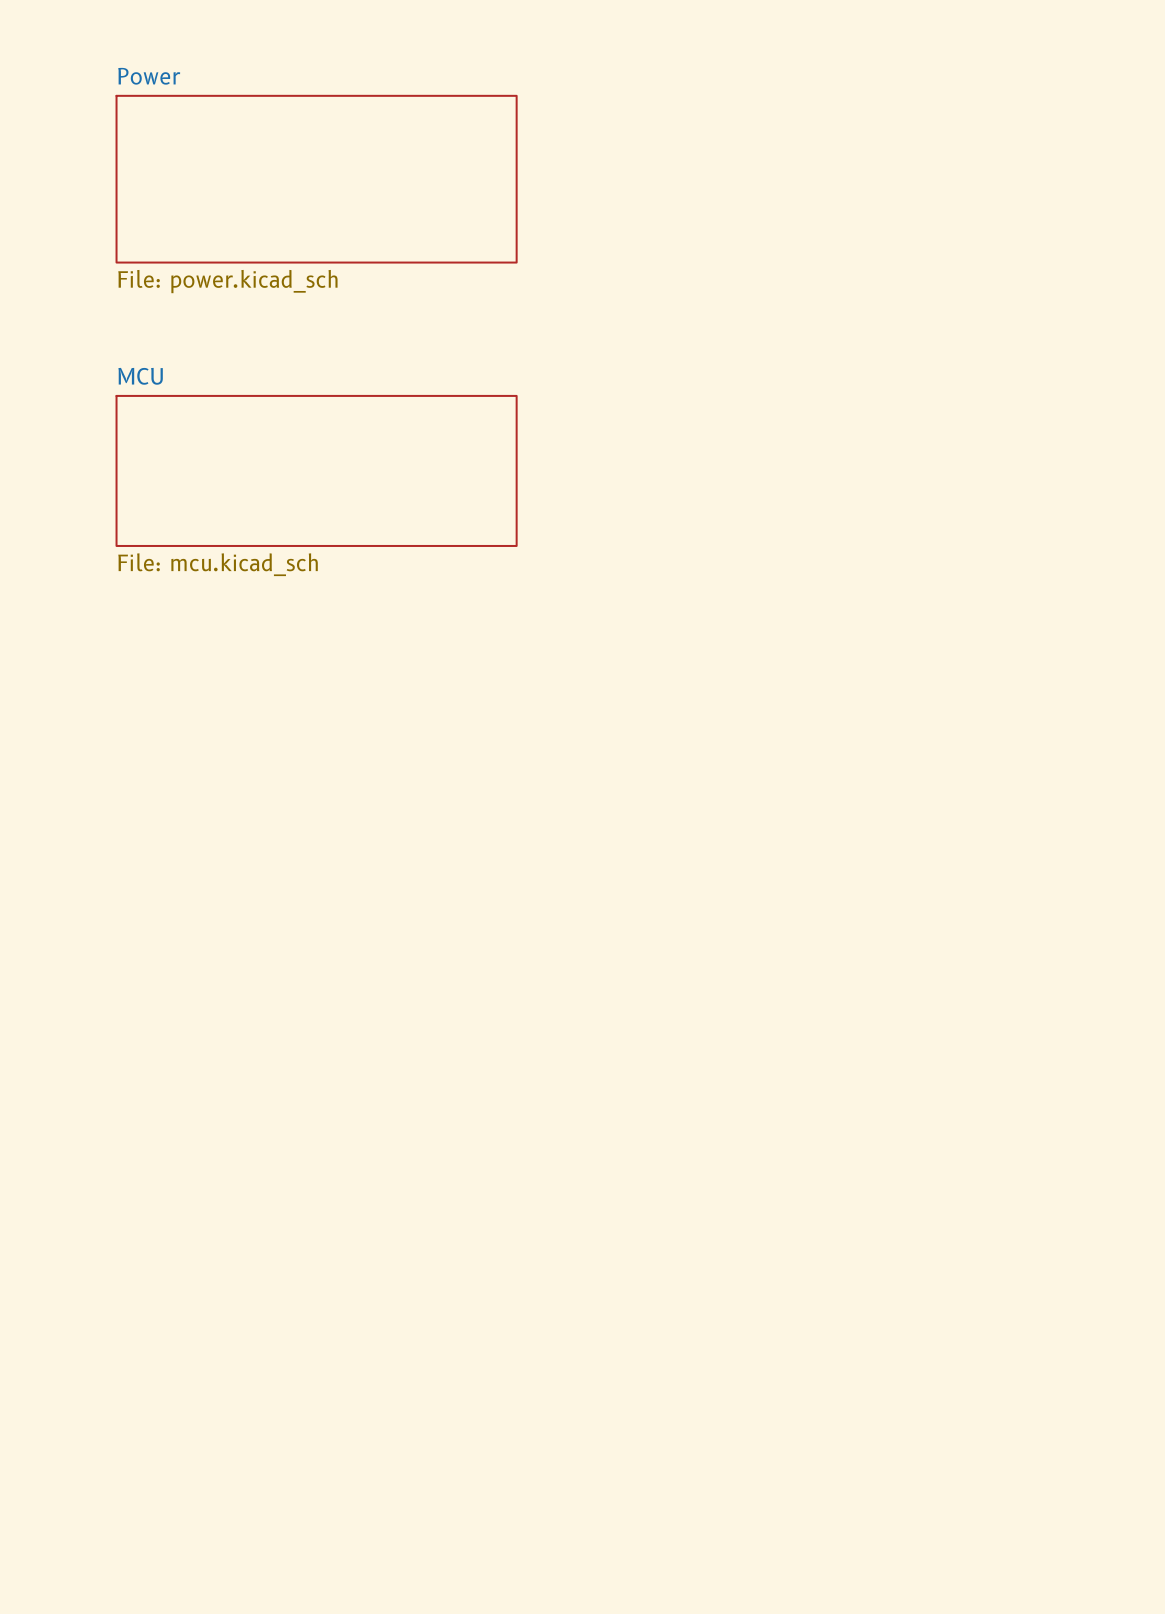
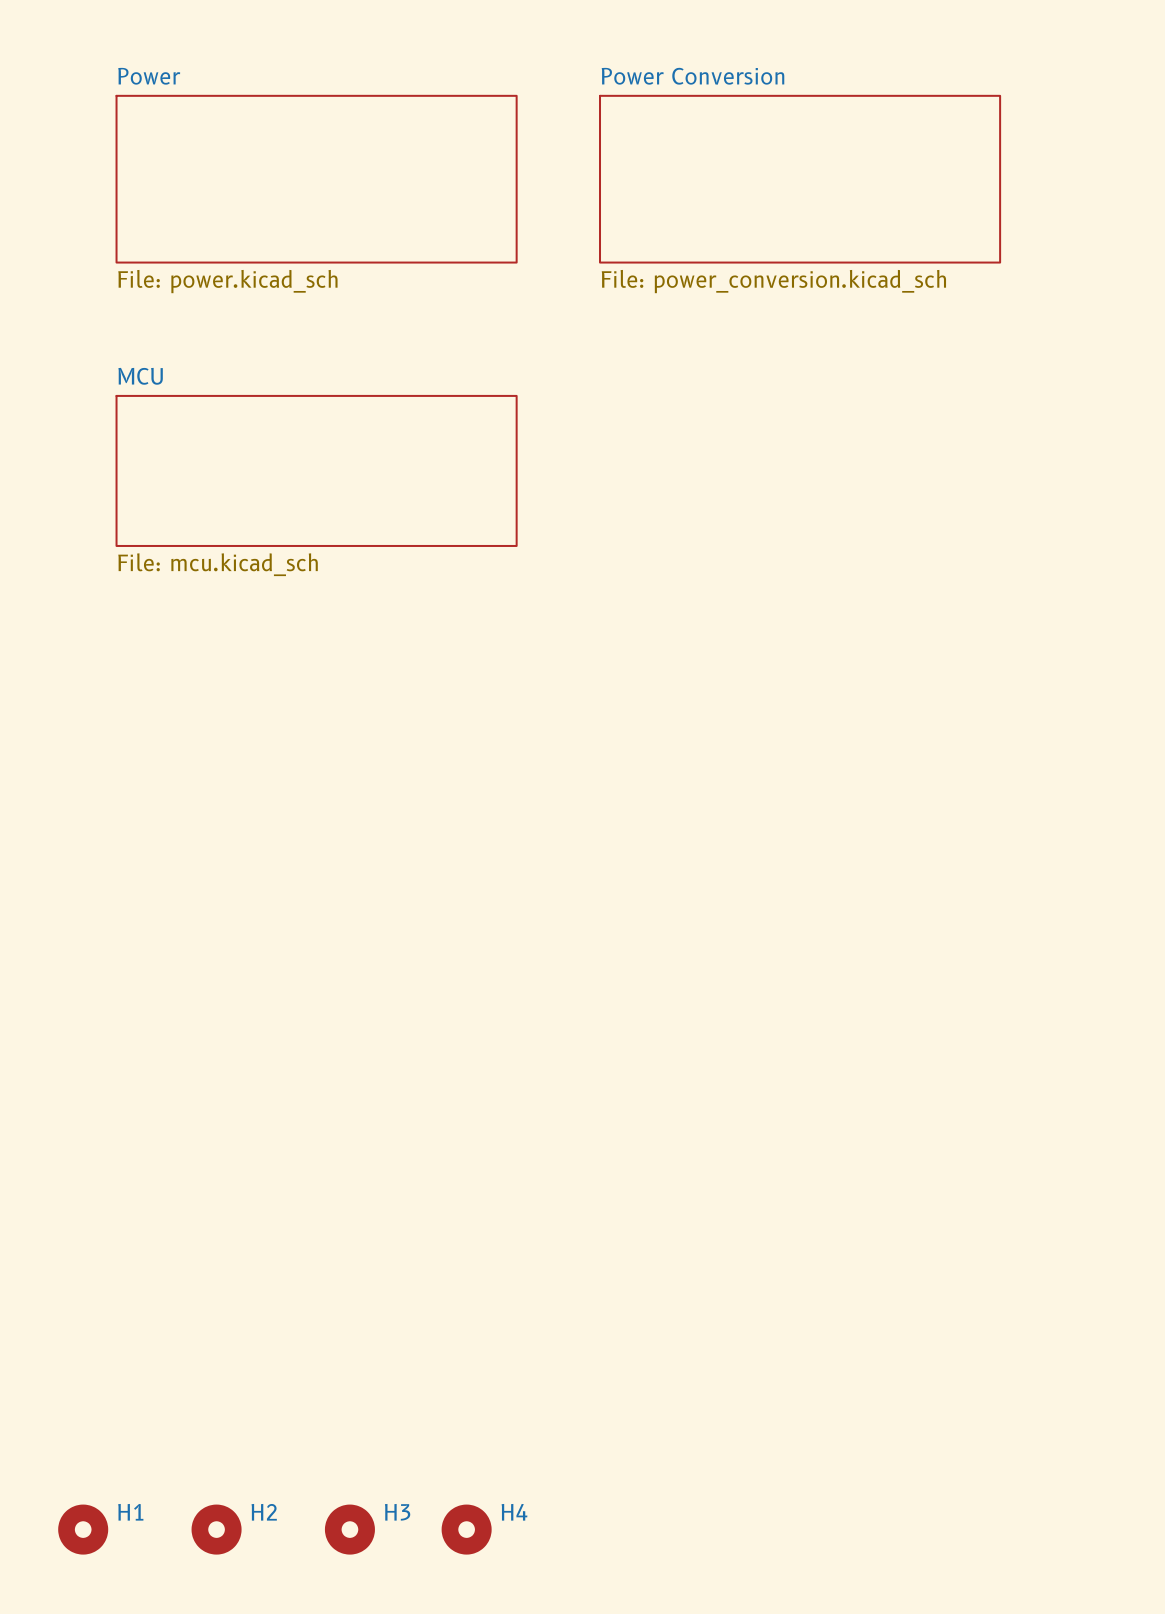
sheet Power Conversion: none -> File: power_conversion.kicad_sch (800, 179)
H1: none -> (83, 1529)
H2: none -> (216, 1529)
H3: none -> (349, 1529)
H4: none -> (466, 1529)

